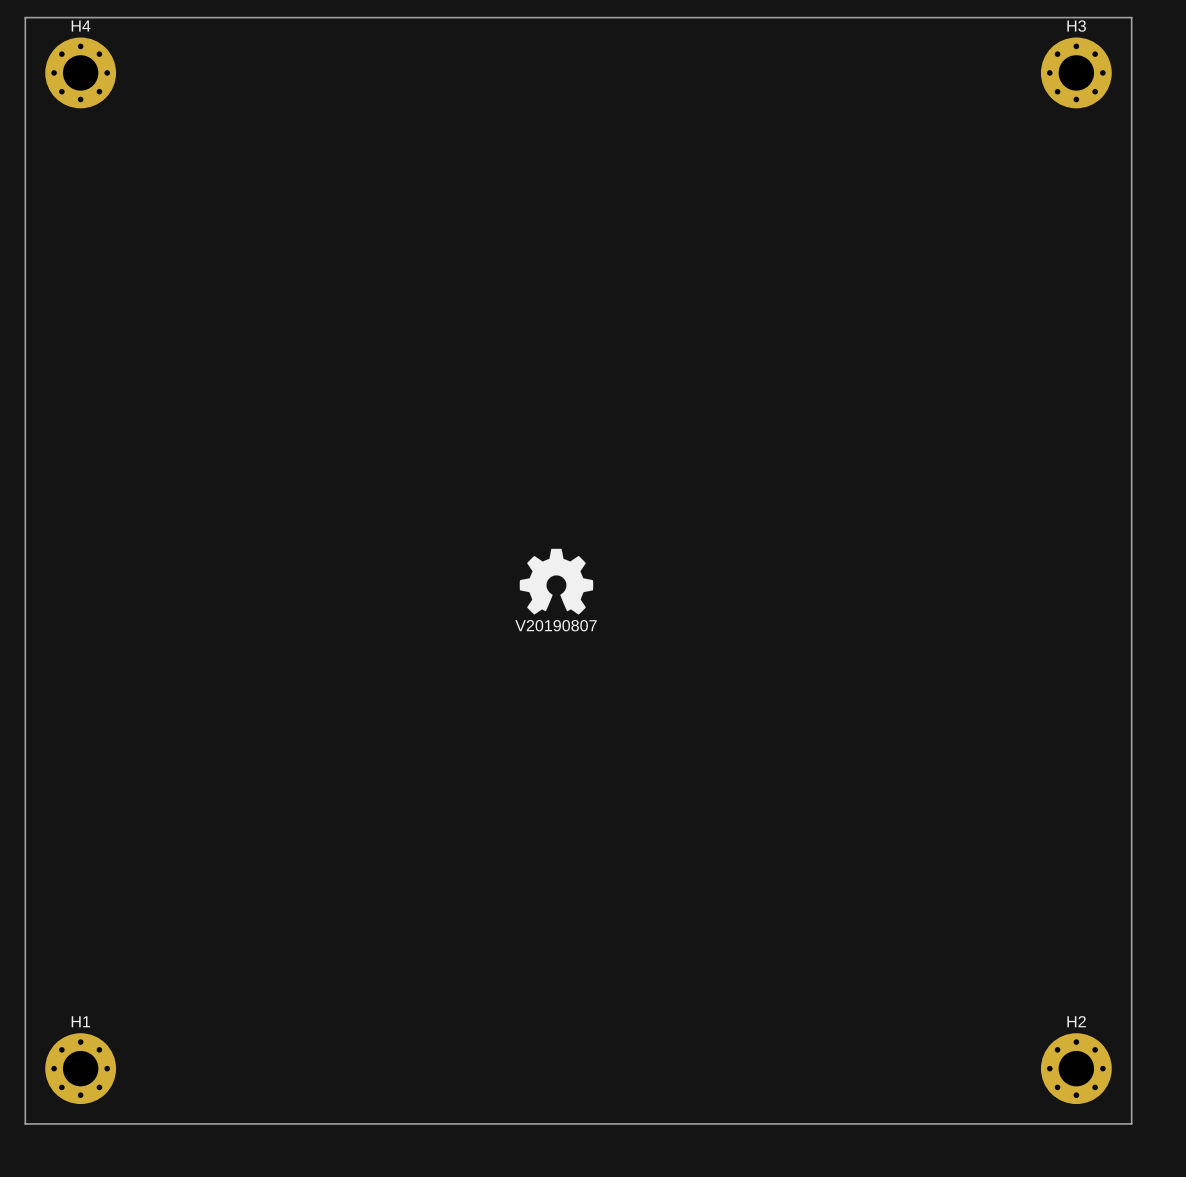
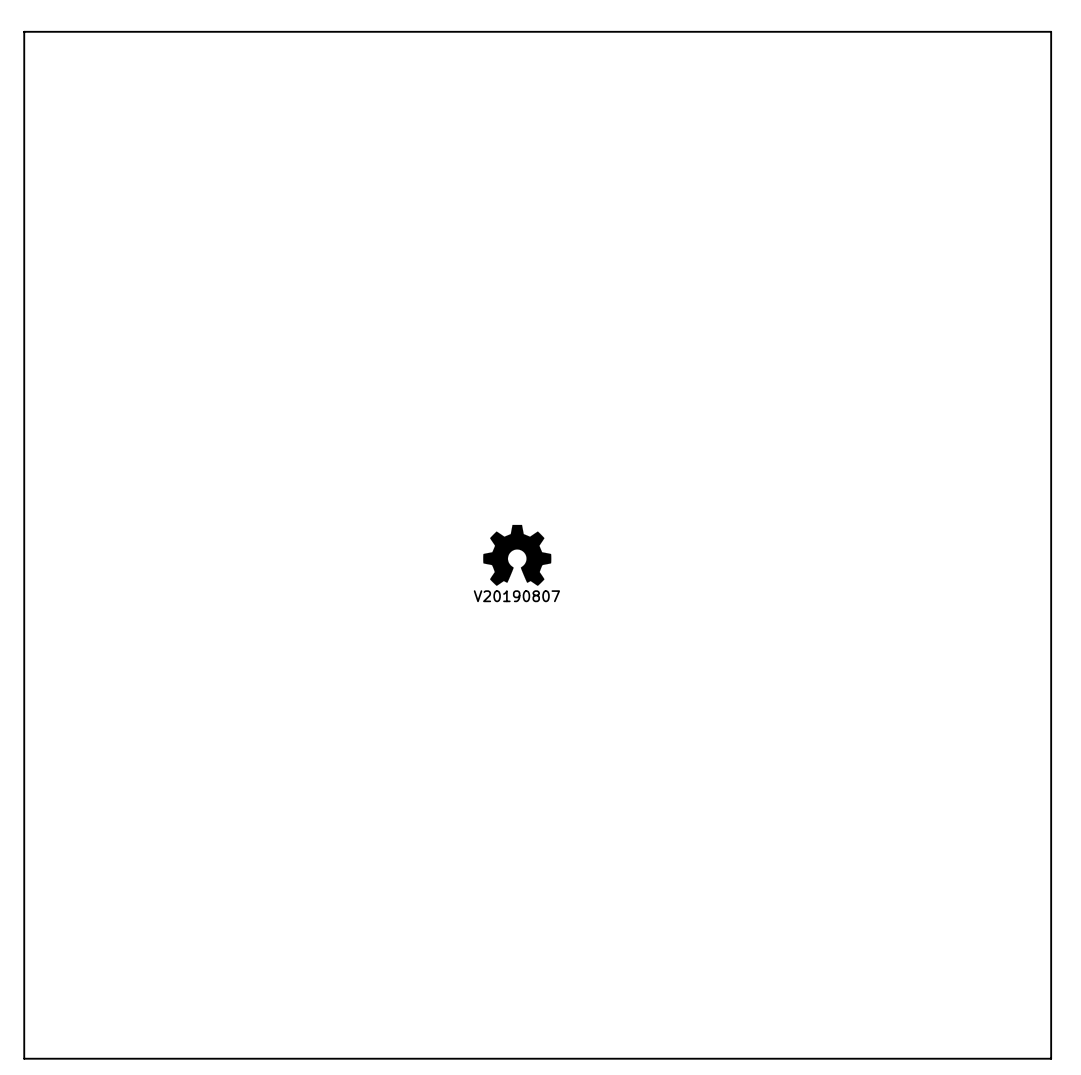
H4: (80, 72) -> none
H3: (1076, 72) -> none
H1: (80, 1068) -> none
H2: (1076, 1068) -> none

